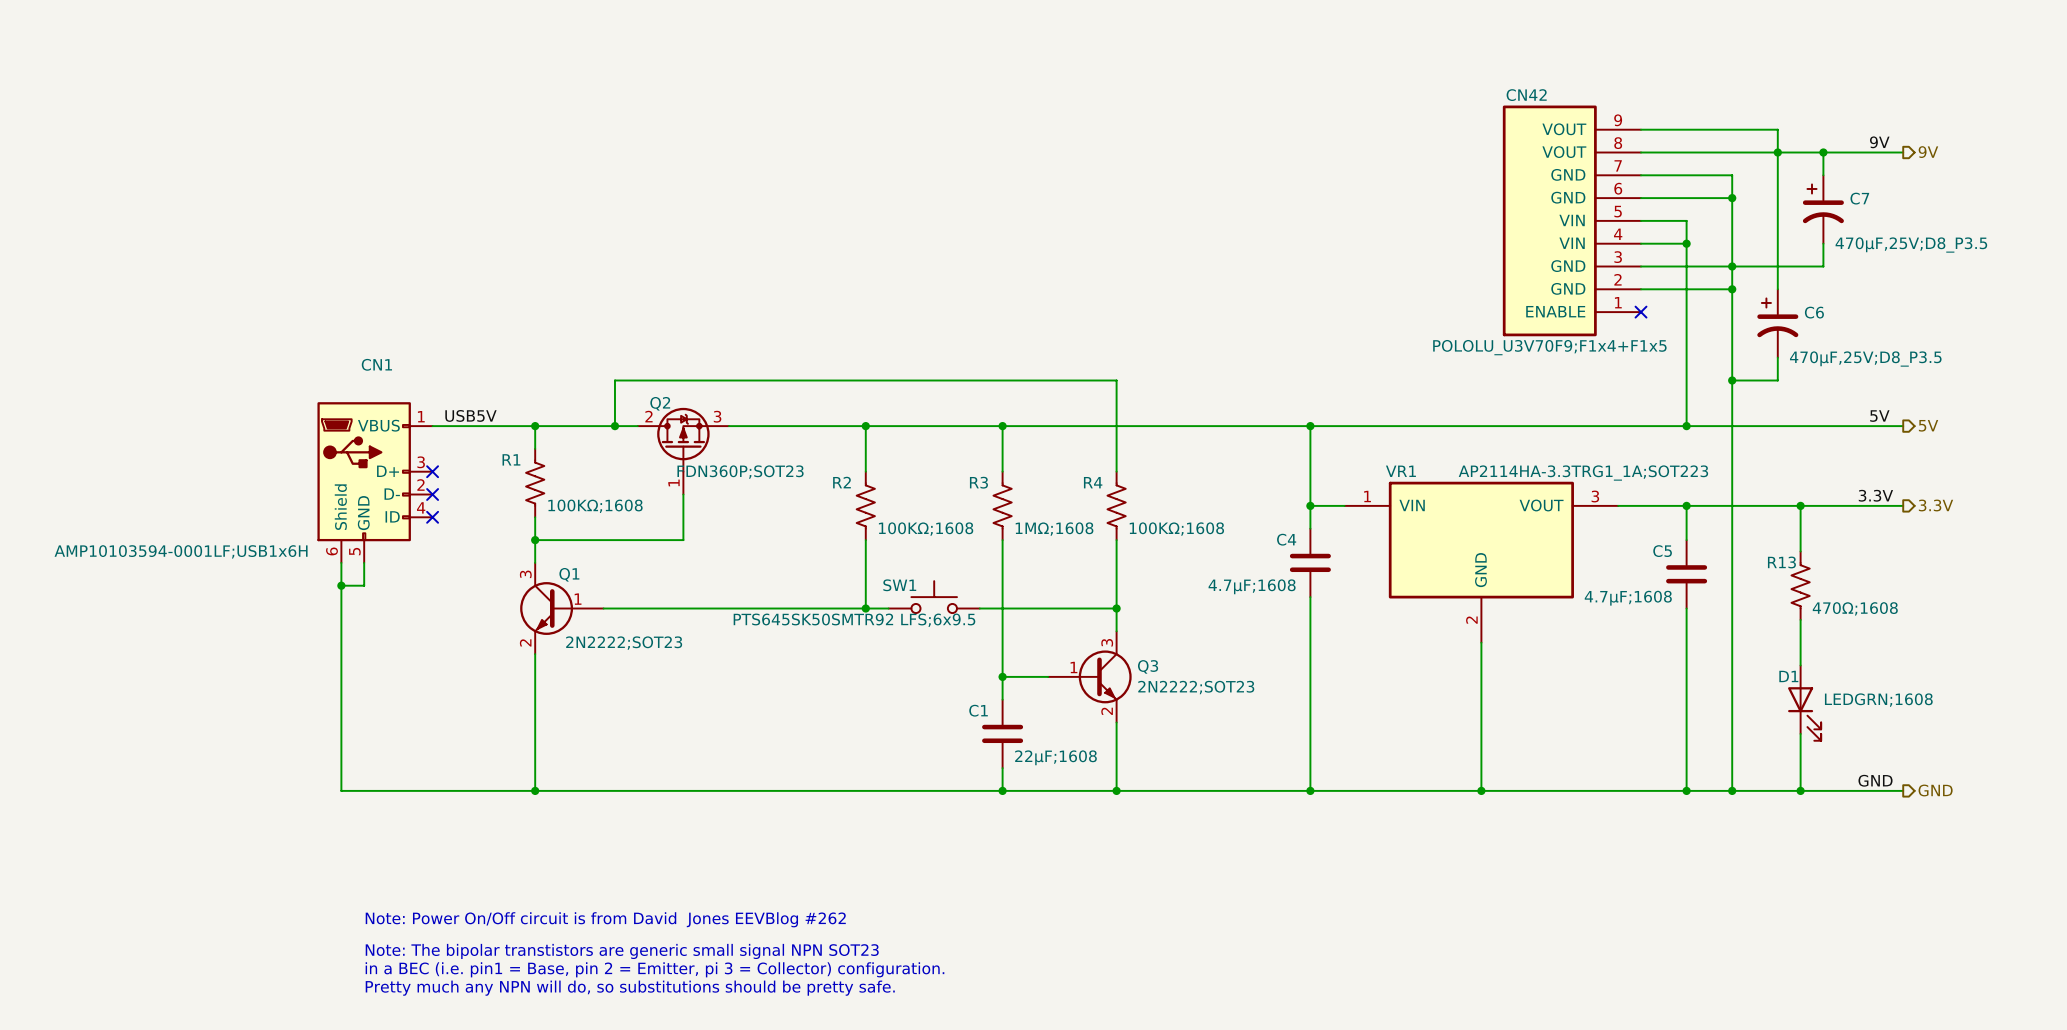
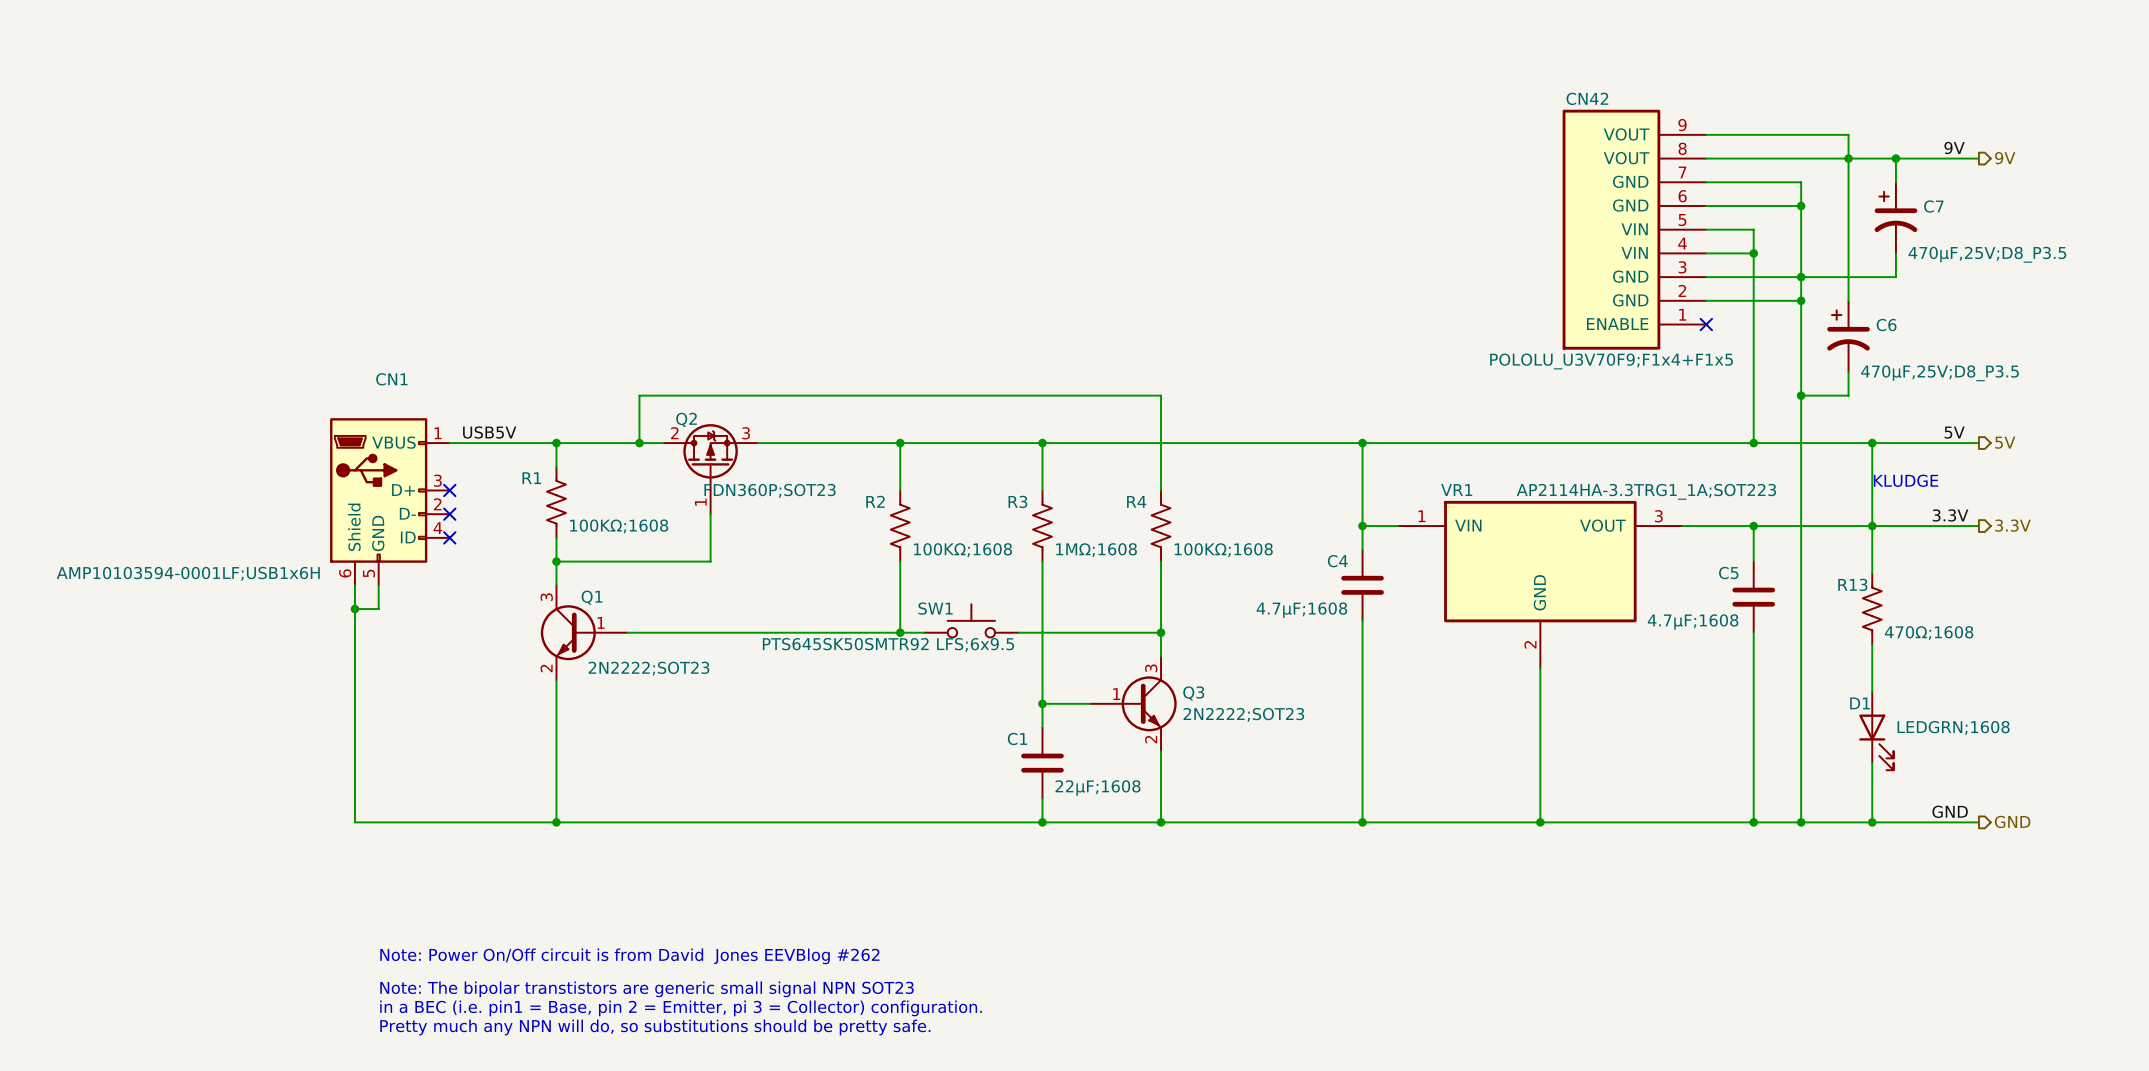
wire: none -> (1872, 443) (1872, 526)
junction: none -> (1872, 443)
text: none -> KLUDGE (1906, 480)

